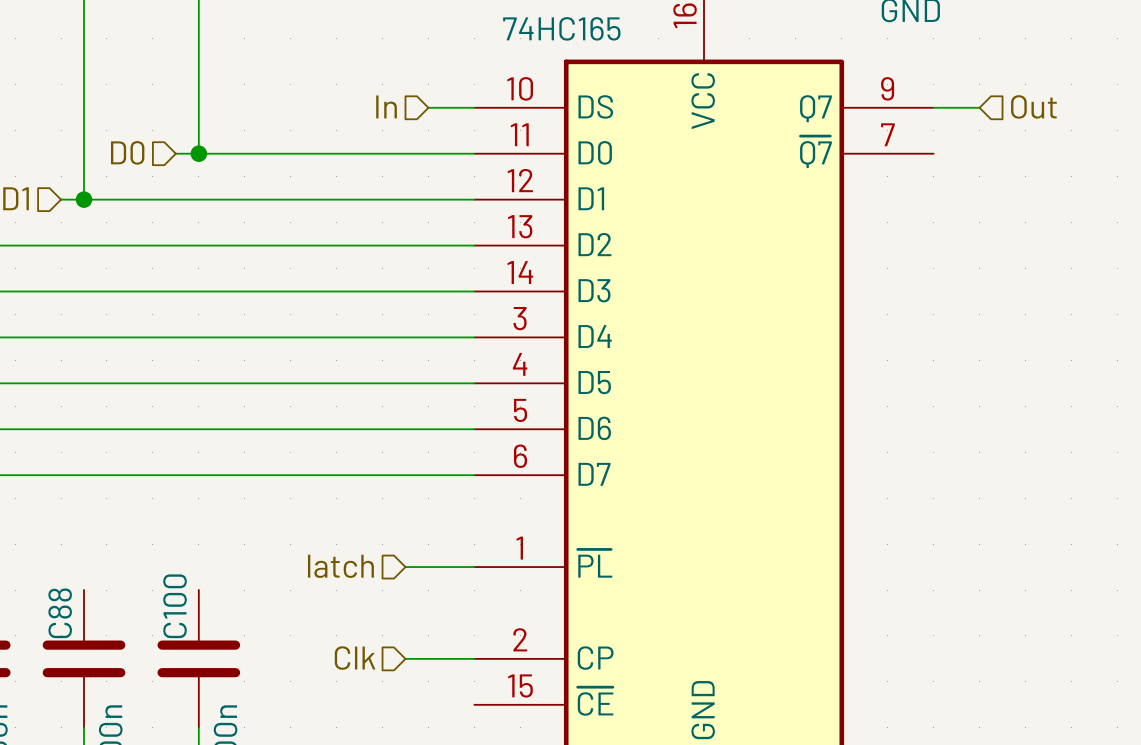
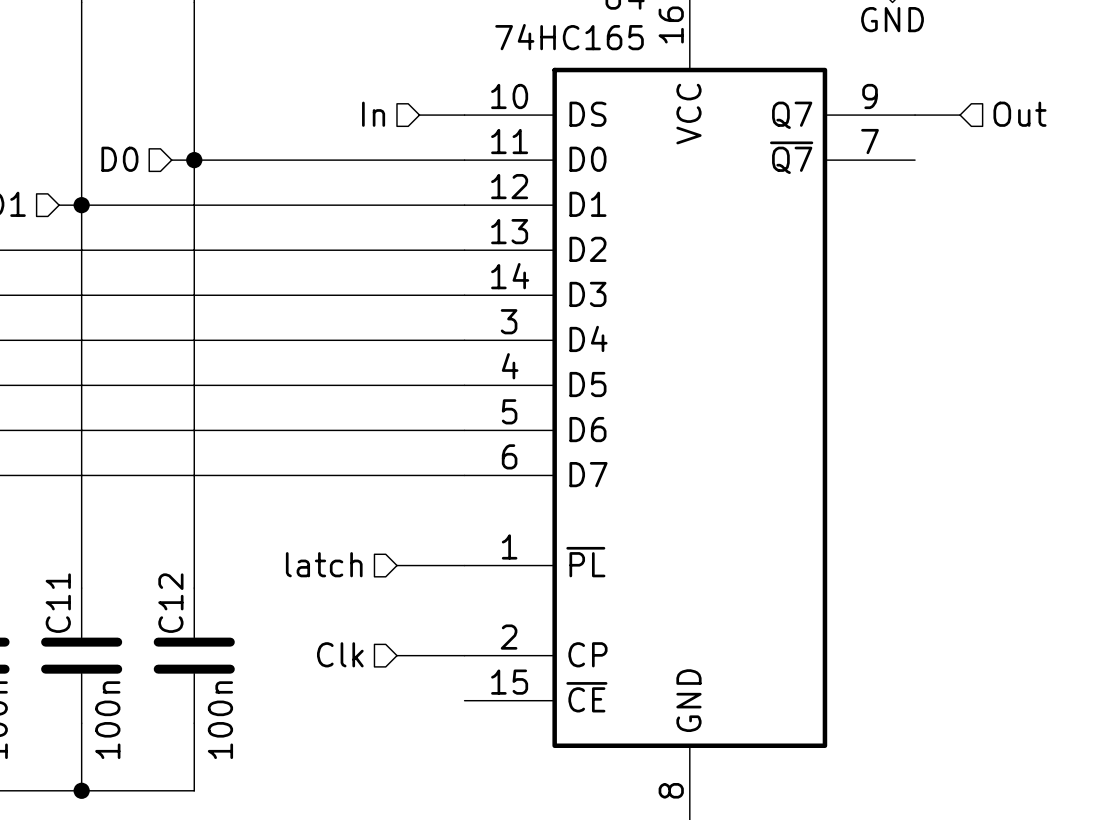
wire: none -> (194, 160) (194, 588)
wire: none -> (81, 205) (81, 588)
C100 name: C100 (175, 606) -> C12 (170, 603)
C88 name: C88 (60, 613) -> C11 (58, 603)

